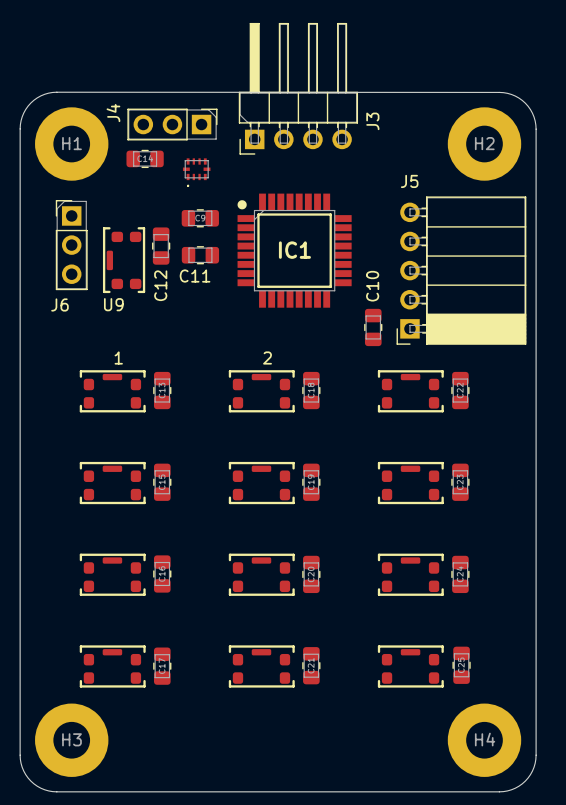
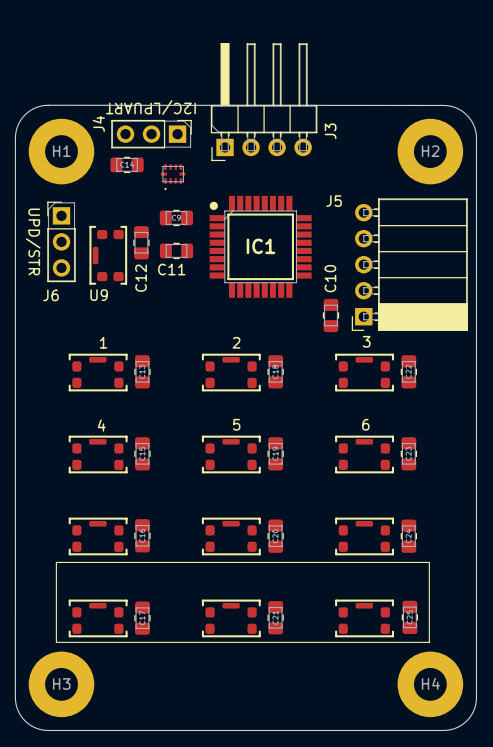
text: none -> I2C/LPUART (150, 107)
J5 name position: J5 (409, 181) -> J5 (334, 201)
text: none -> UPD/STR (33, 241)
text: none -> 3 (366, 341)
text: none -> 5 (236, 424)
text: none -> 6 (365, 424)
text: none -> 4 (101, 425)
line: none -> (56, 562) (429, 562) (429, 642) (56, 642) (56, 562)

